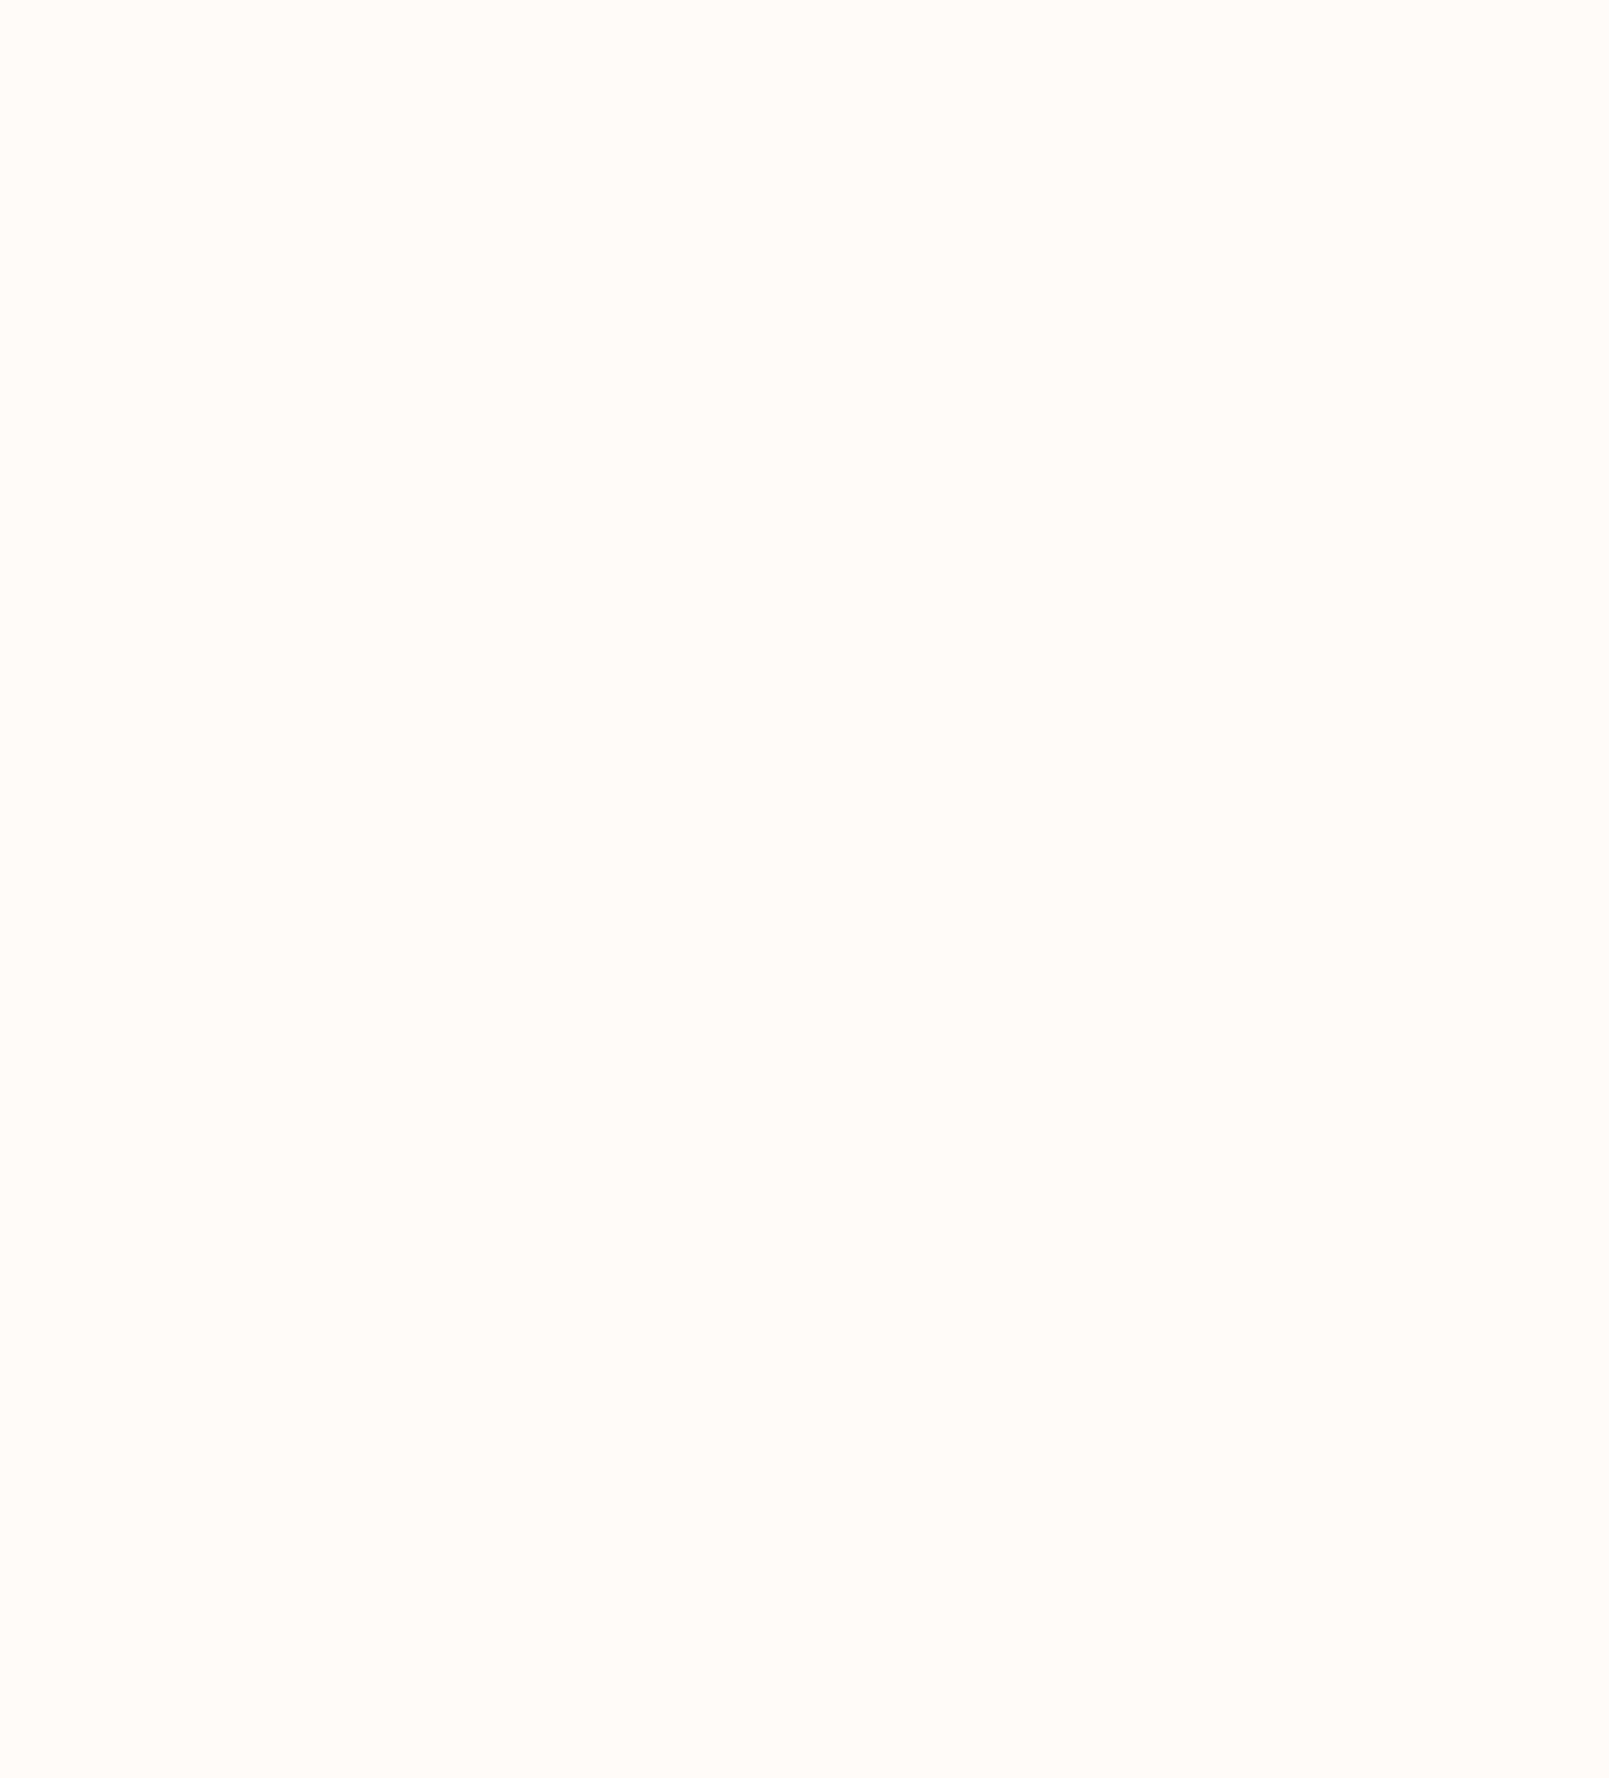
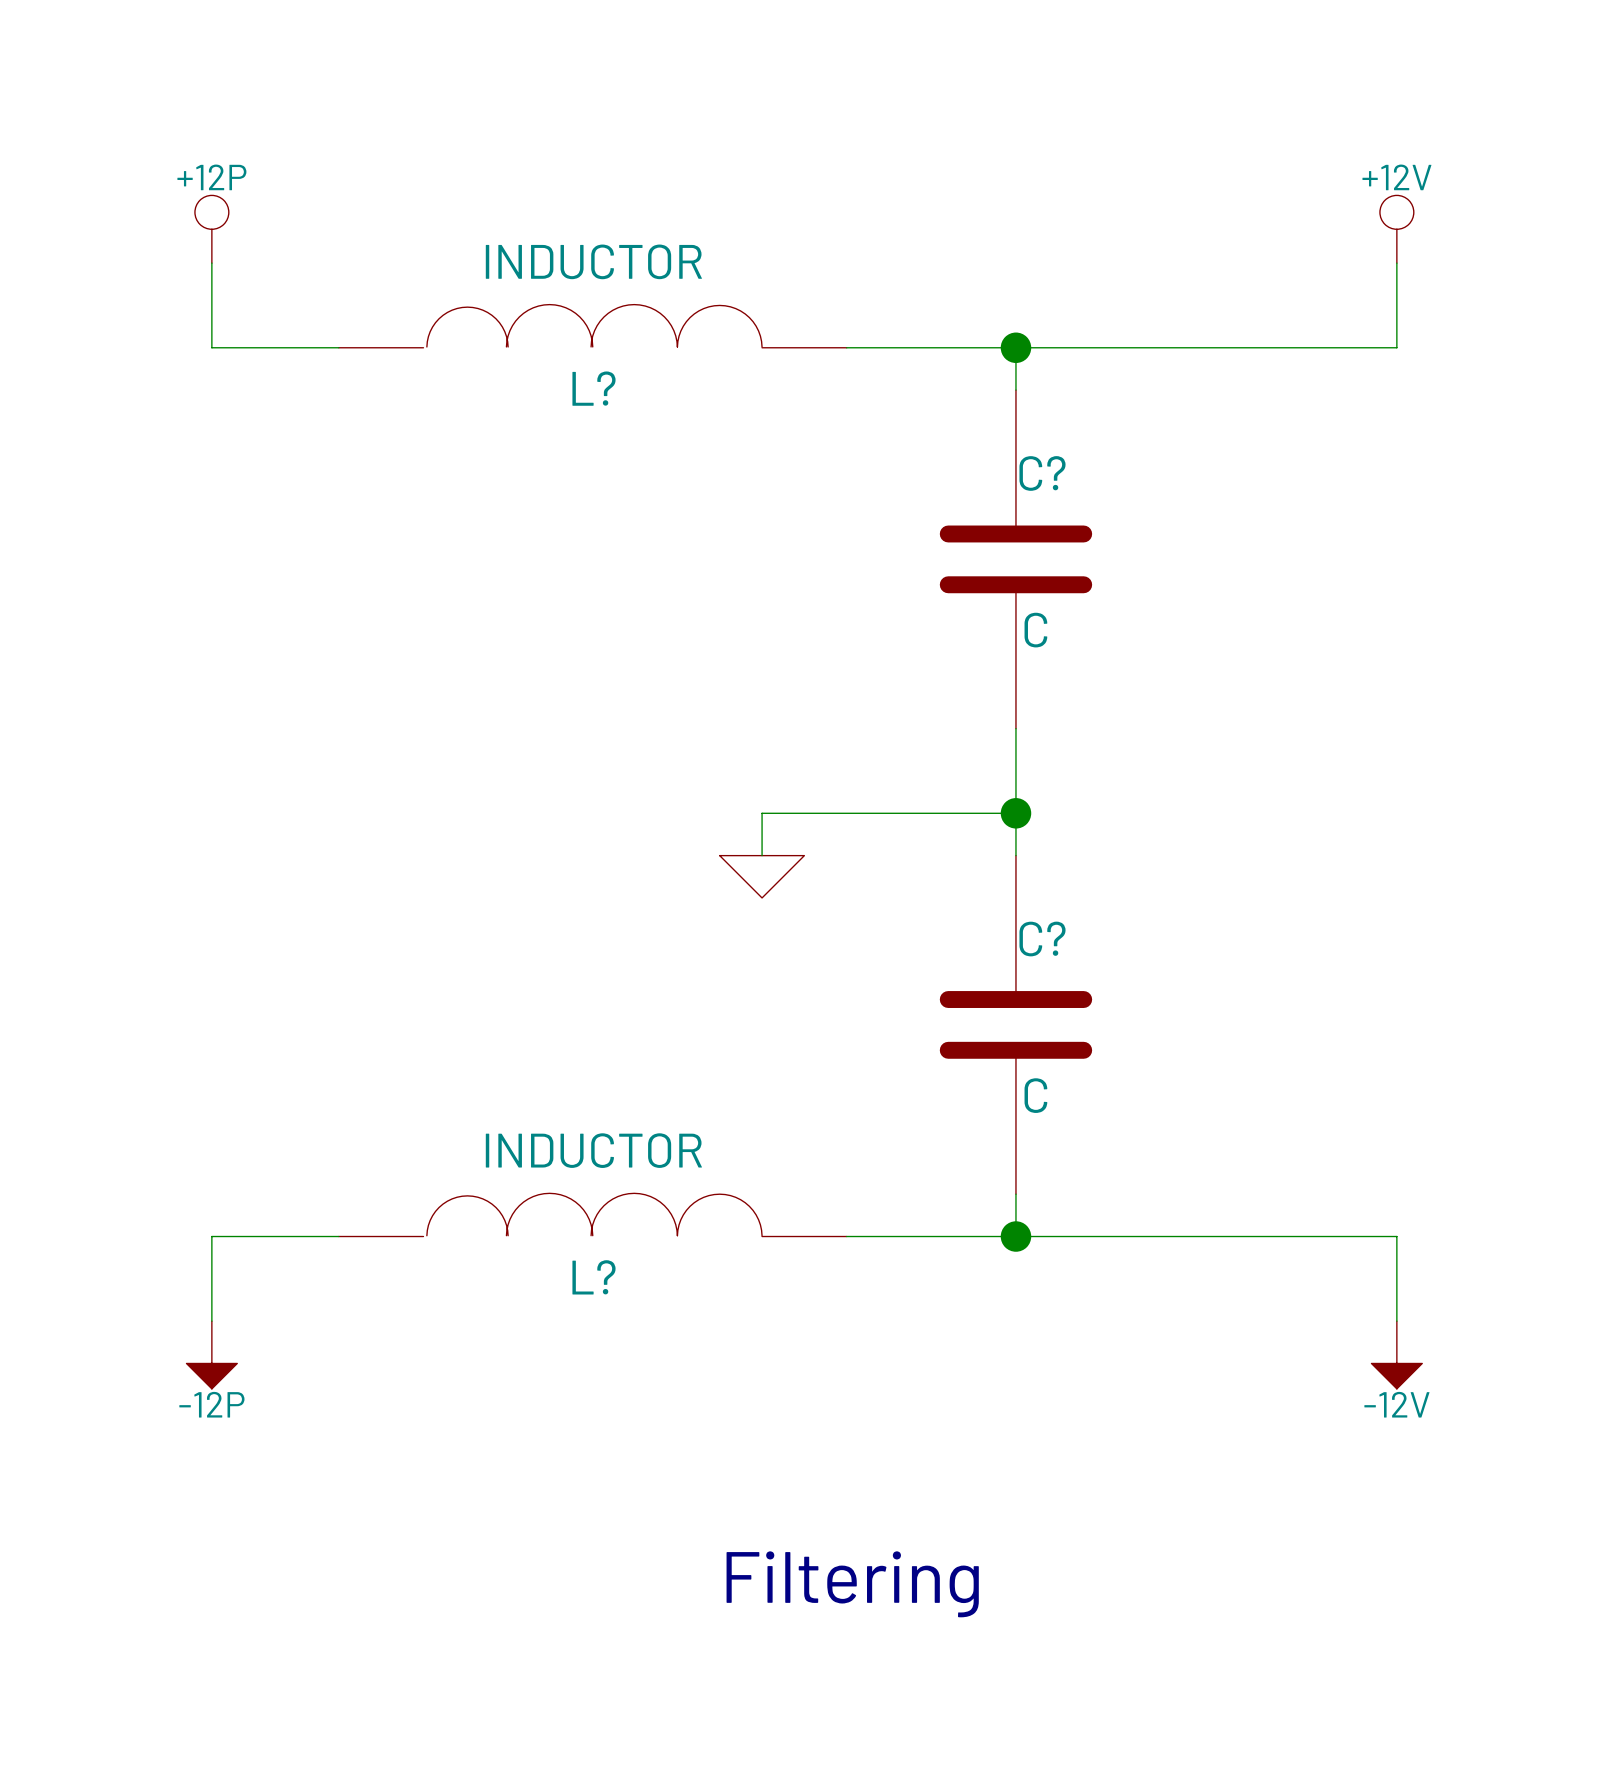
power symbol: none -> +12P (211, 229)
power symbol: none -> +12V (1396, 229)
wire: none -> (211, 263) (211, 347) (338, 347)
wire: none -> (1396, 263) (1396, 347) (846, 347)
L?: none -> INDUCTOR (592, 326)
wire: none -> (1015, 347) (1015, 390)
junction: none -> (1015, 347)
C?: none -> C (1015, 559)
wire: none -> (1015, 728) (1015, 855)
wire: none -> (1015, 813) (762, 813) (762, 855)
junction: none -> (1015, 813)
power symbol: none -> (762, 876)
C?: none -> C (1015, 1024)
wire: none -> (1015, 1194) (1015, 1236)
L?: none -> INDUCTOR (592, 1214)
wire: none -> (338, 1236) (211, 1236) (211, 1321)
wire: none -> (846, 1236) (1396, 1236) (1396, 1321)
junction: none -> (1015, 1236)
power symbol: none -> -12P (211, 1355)
power symbol: none -> -12V (1396, 1355)
text: none -> Filtering (852, 1584)

